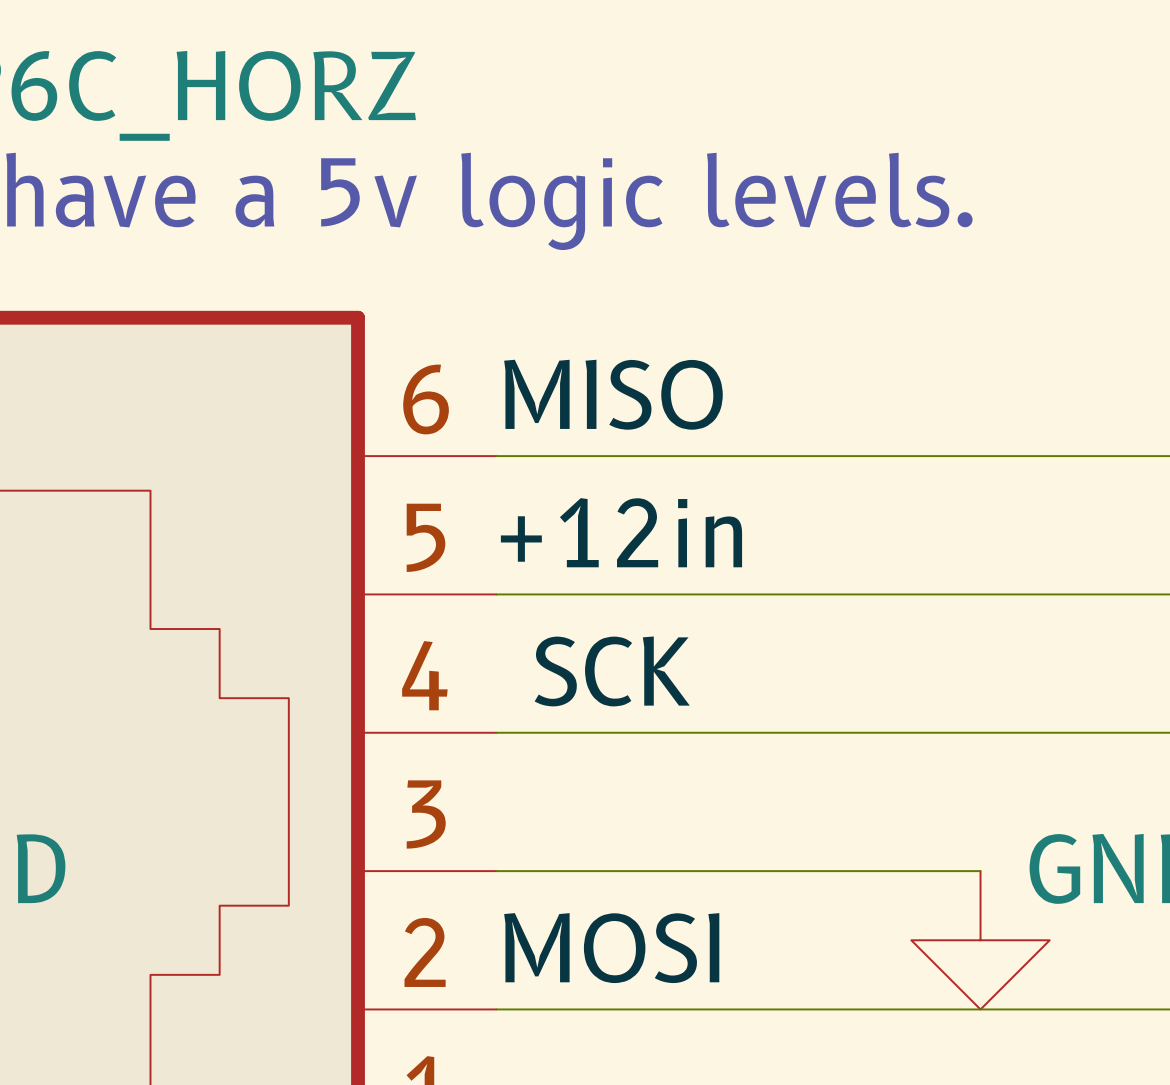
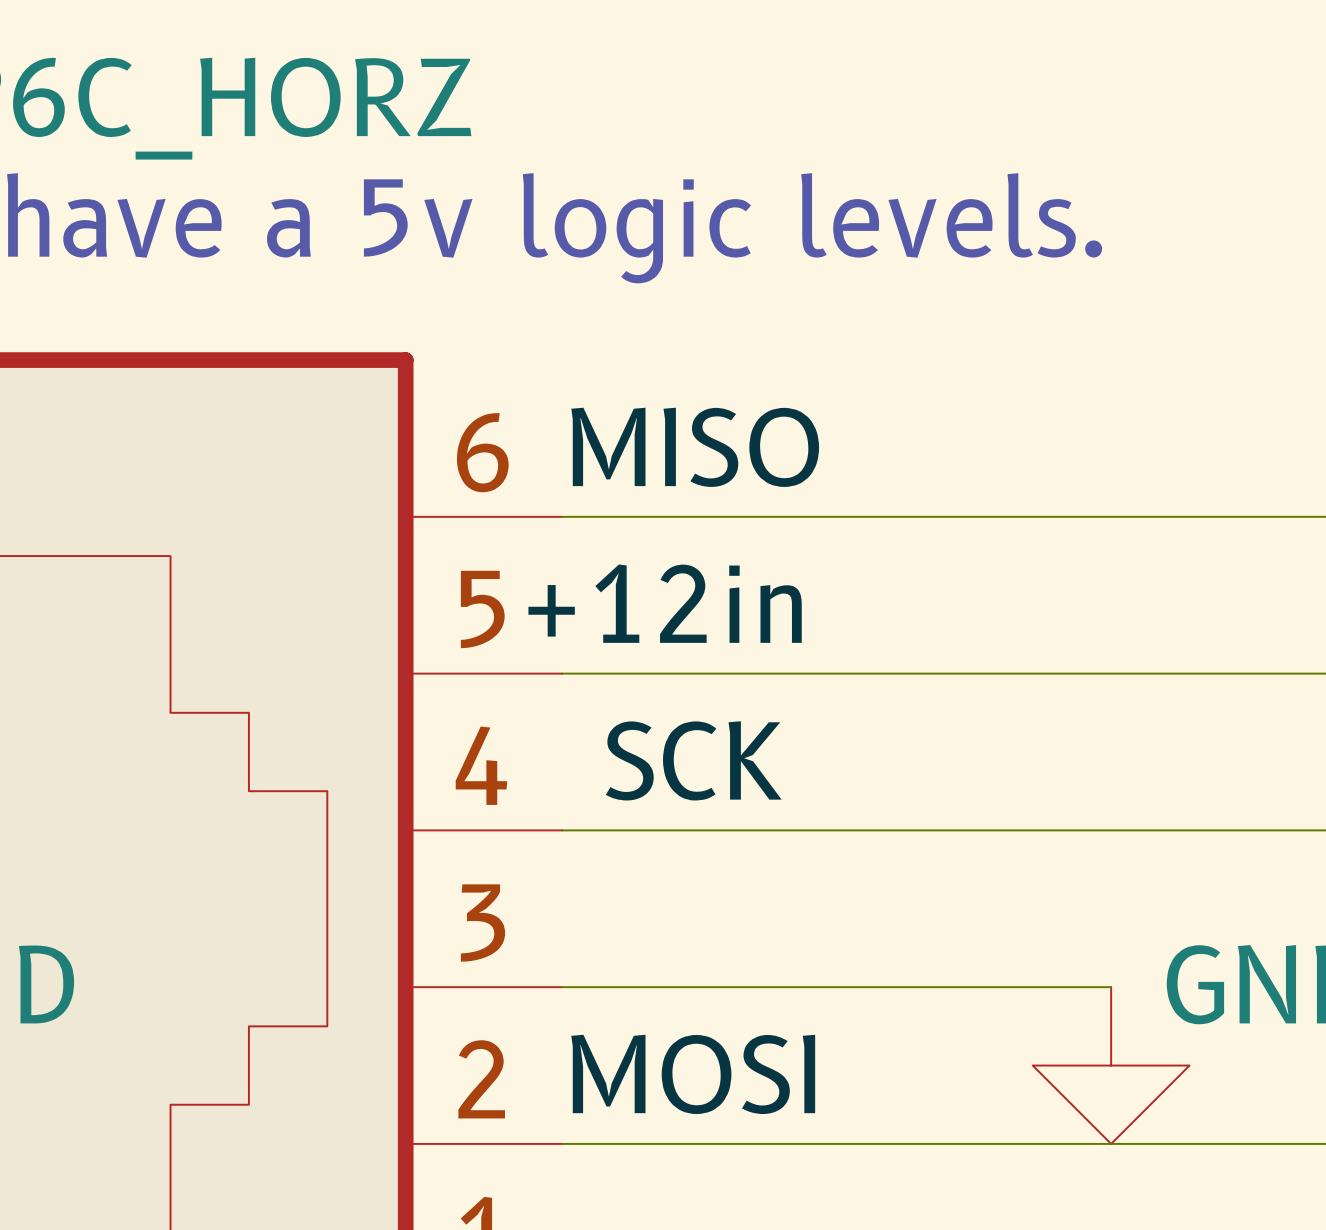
label position: +12in (621, 532) -> +12in (665, 603)

